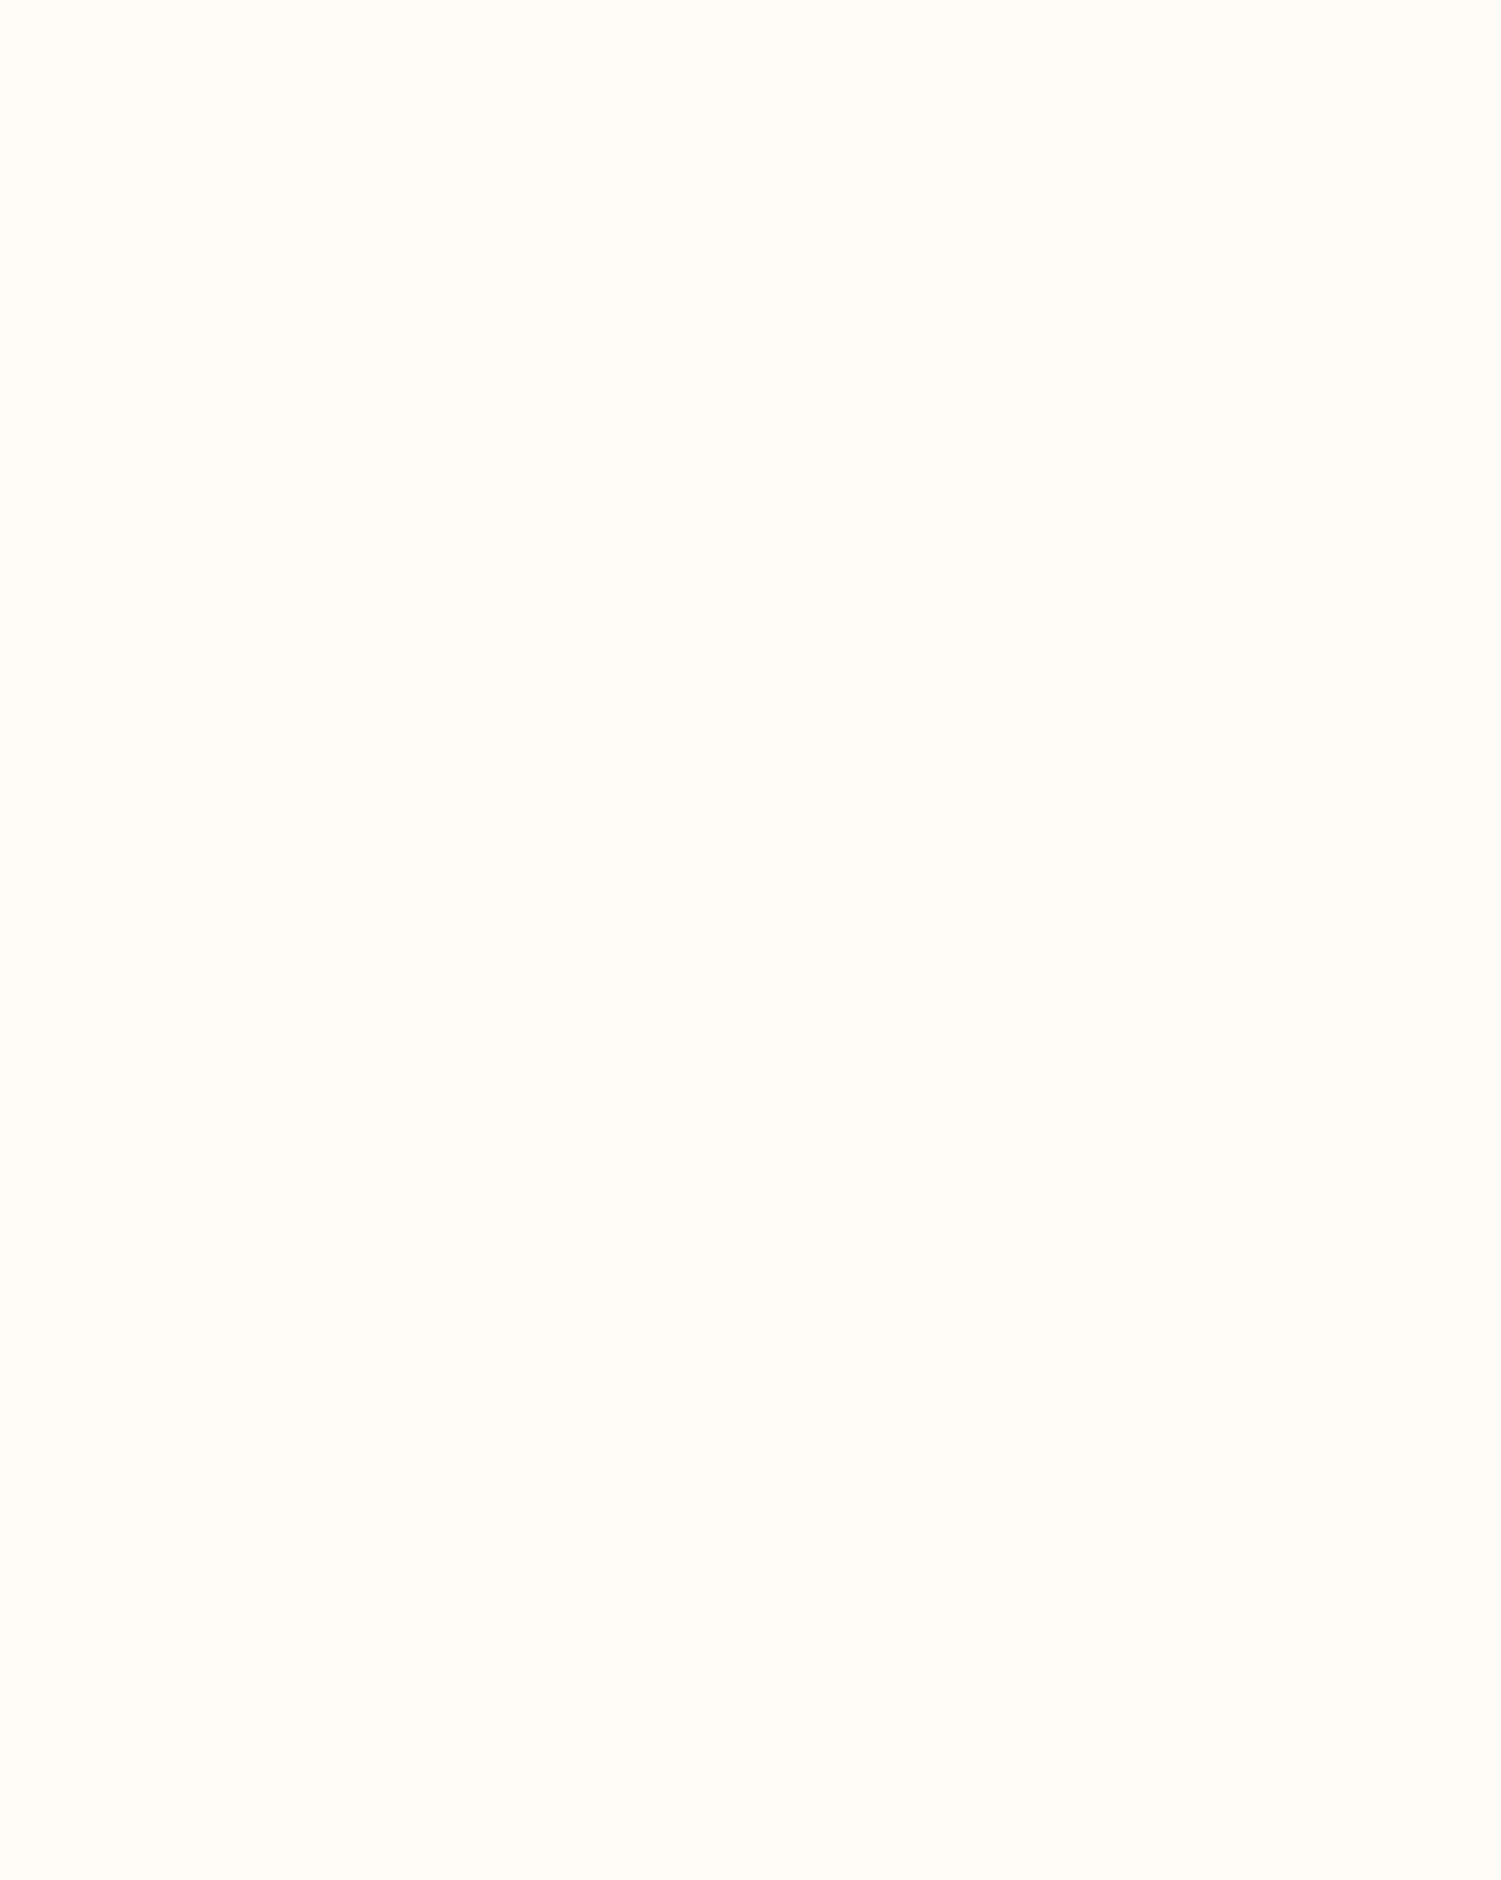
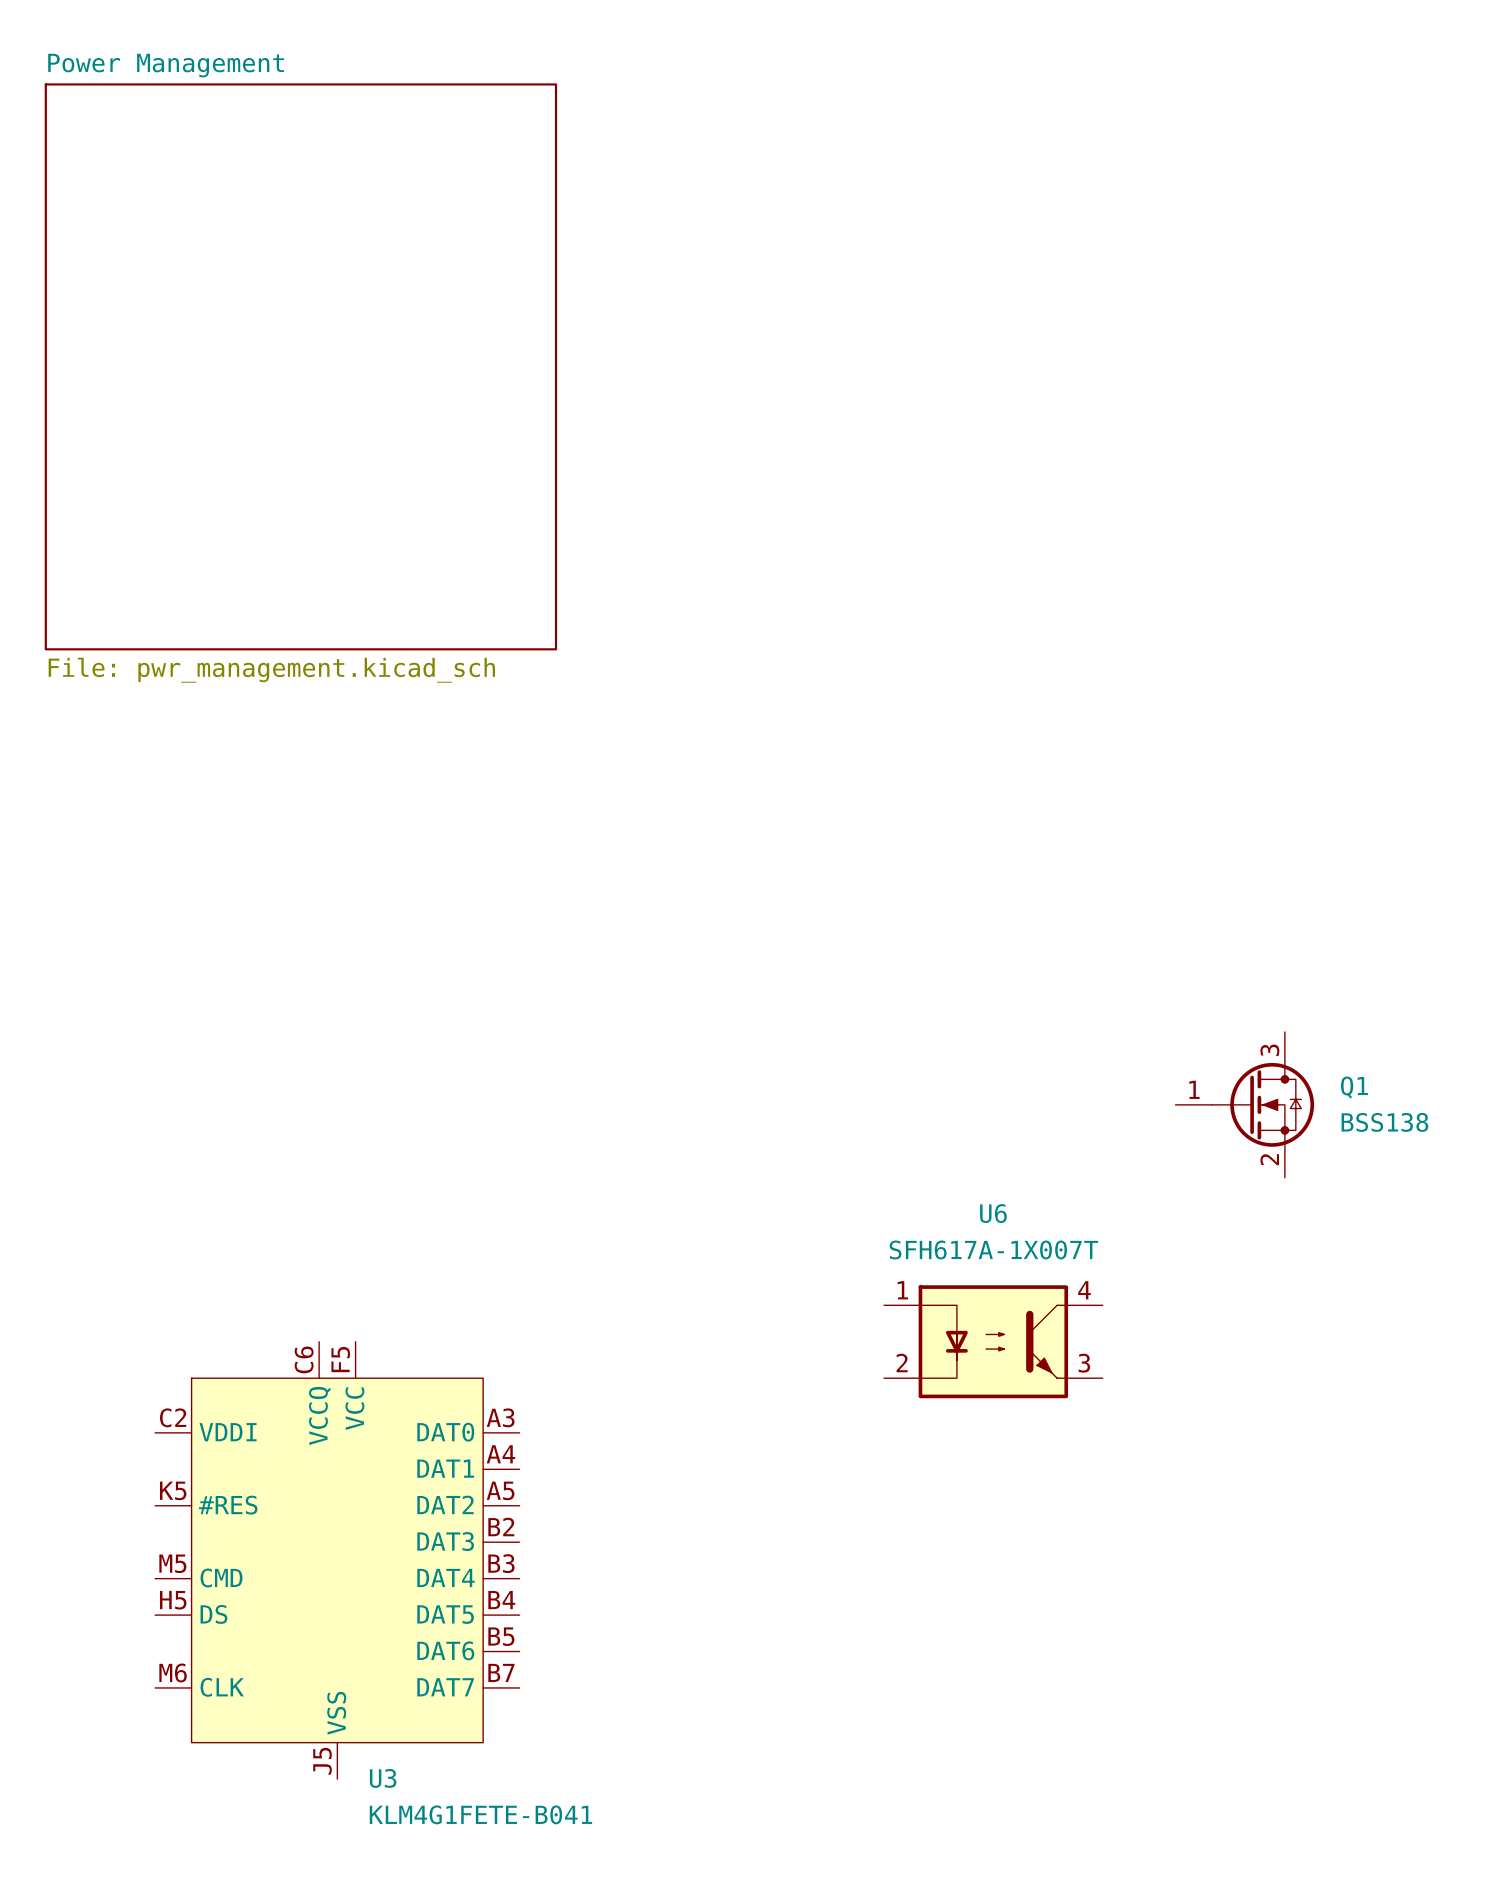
sheet Power Management: none -> File: pwr_management.kicad_sch (300, 366)
Q1: none -> BSS138 (1244, 1104)
U6: none -> SFH617A-1X007T (993, 1341)
U3: none -> KLM4G1FETE-B041 (337, 1560)

